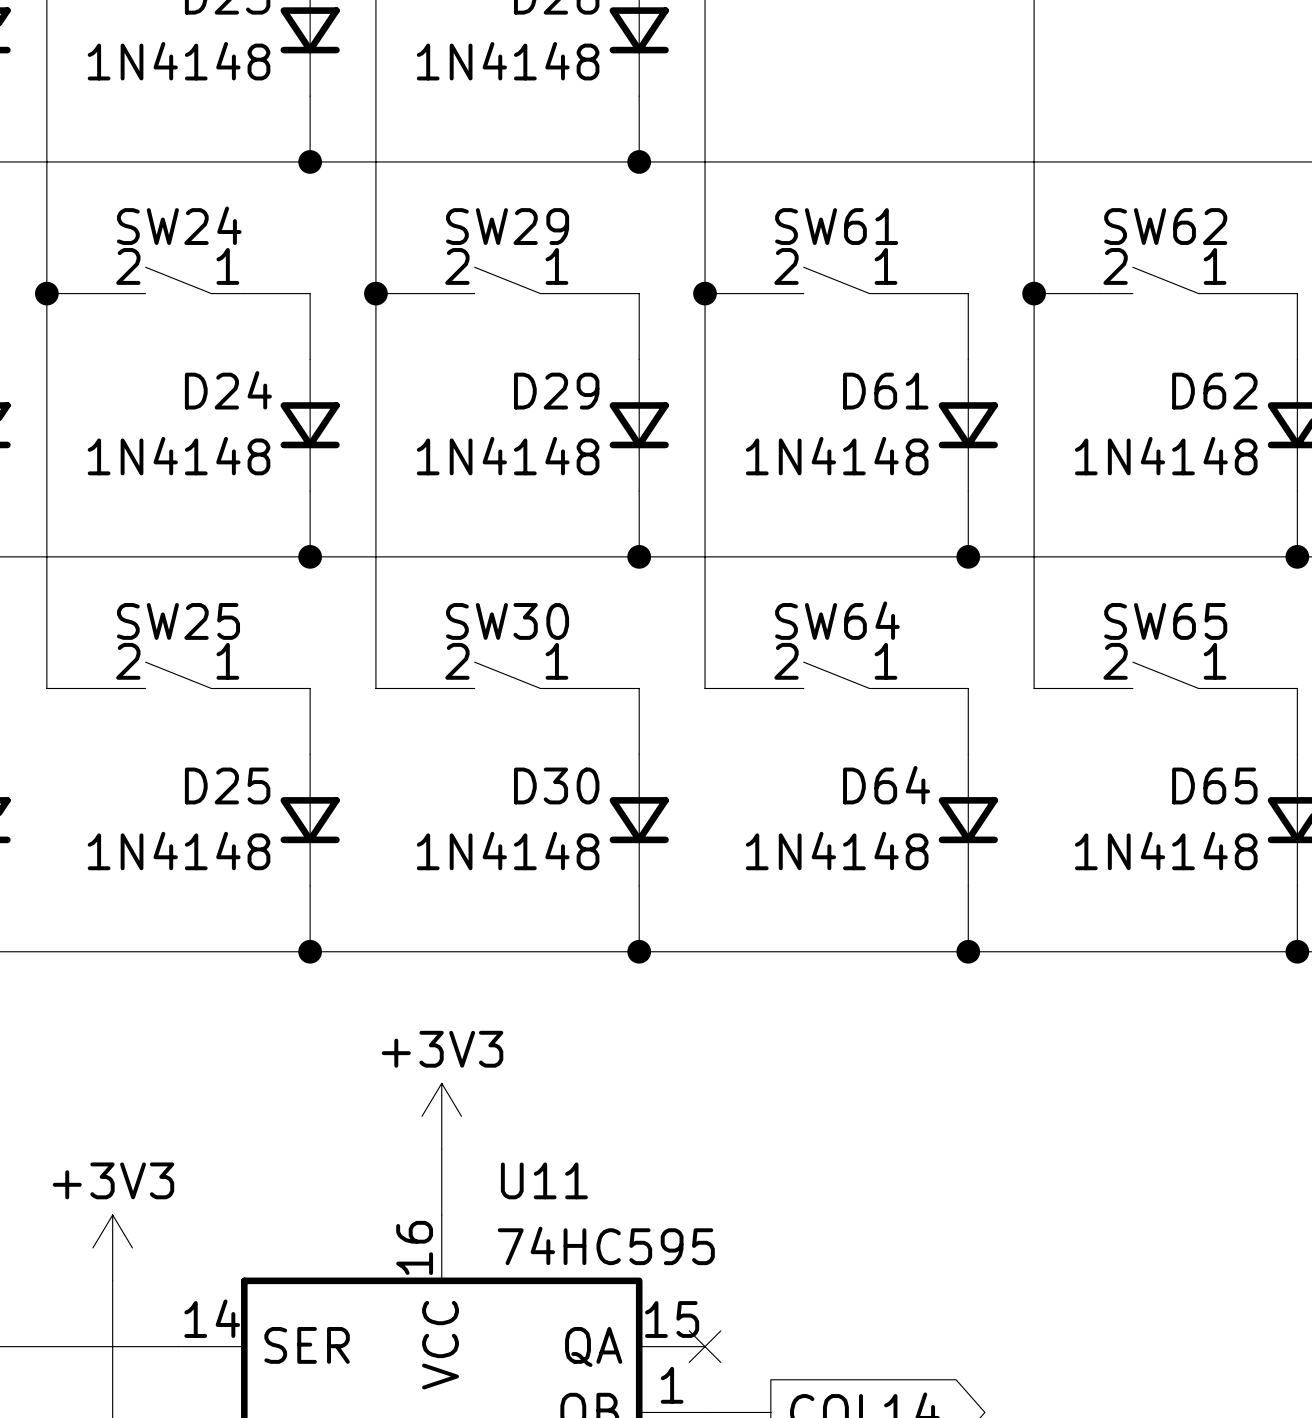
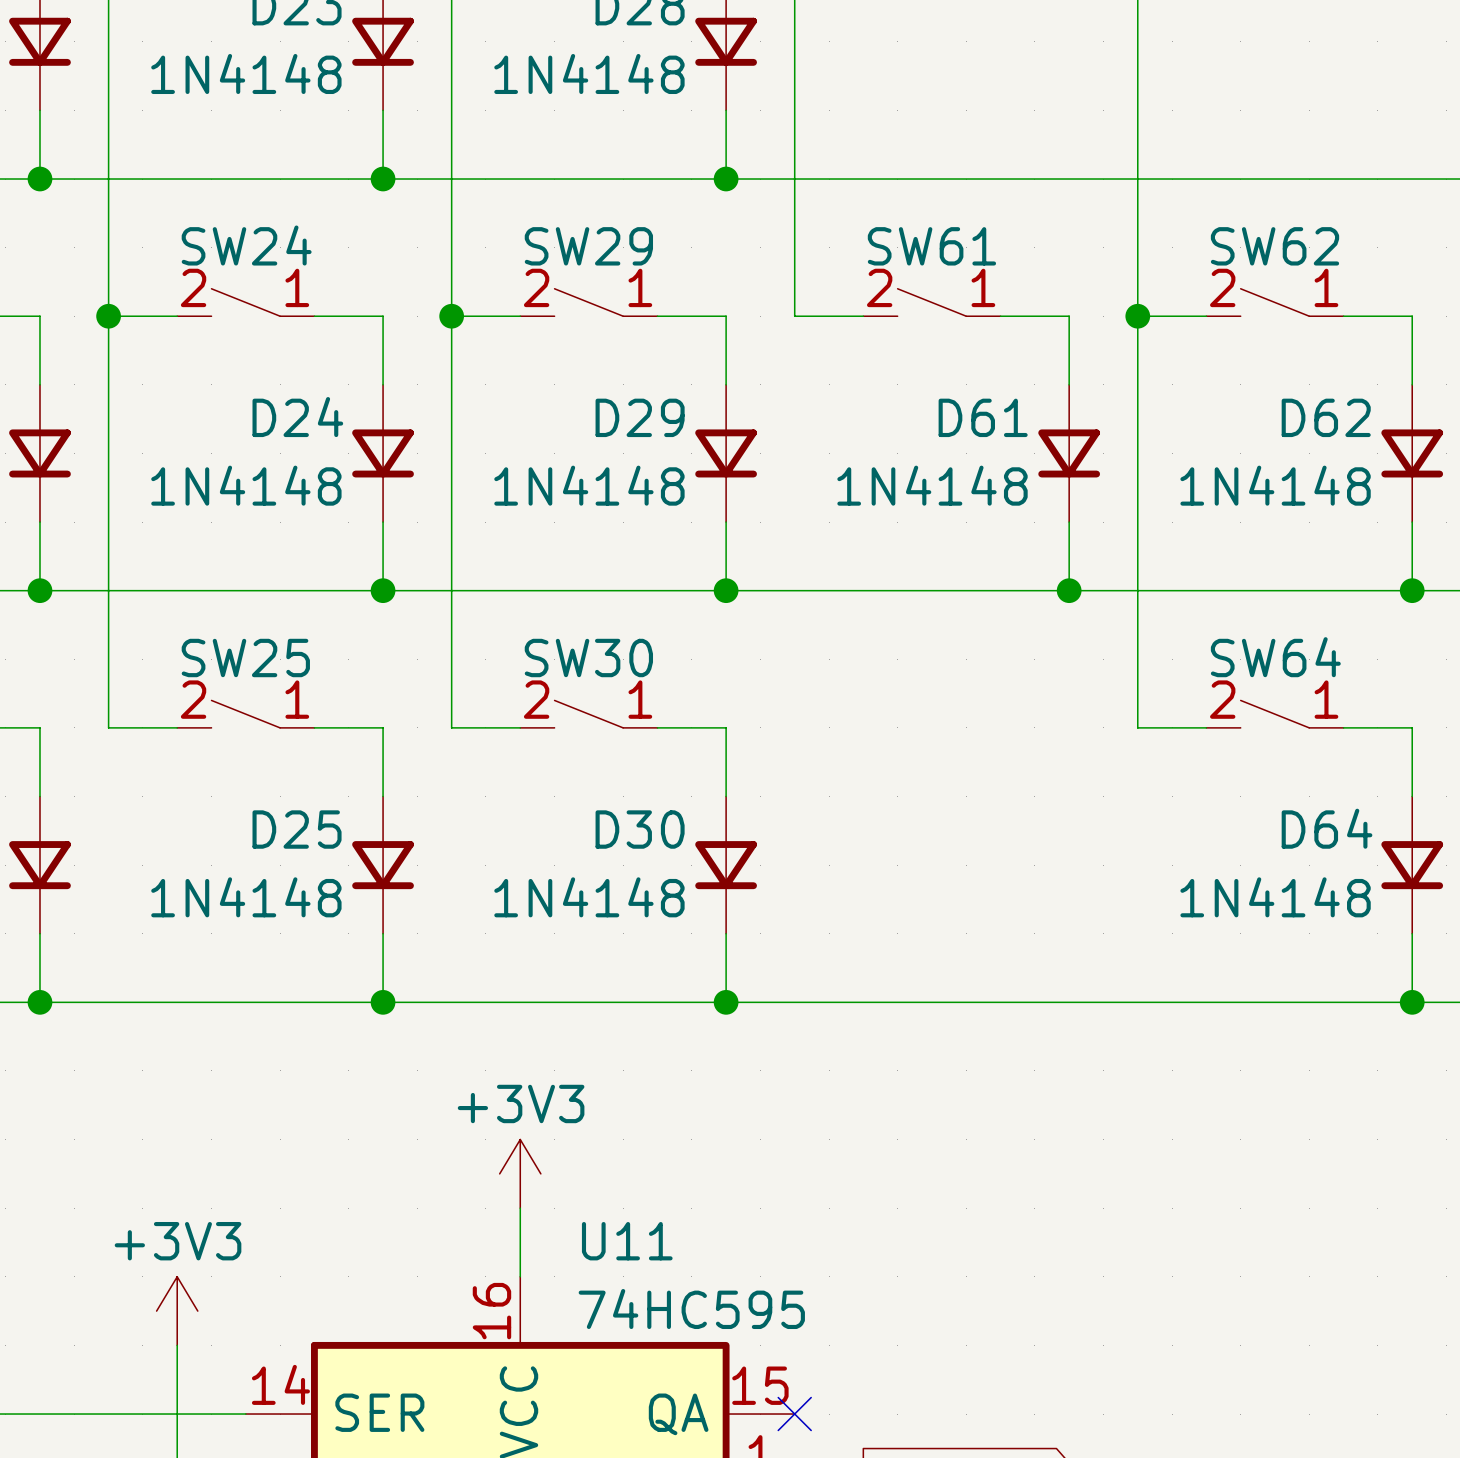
wire: (705, 293) (705, 688) (770, 688) -> none
junction: (705, 293) -> none
SW65 name: SW65 (1165, 621) -> SW64 (1275, 657)
SW64: (836, 675) -> none
wire: (902, 688) (968, 688) (968, 754) -> none
D65 name: D65 (1214, 785) -> D64 (1327, 828)
D64: 1N4148 (968, 820) -> none
wire: (968, 885) (968, 951) -> none
junction: (968, 951) -> none

